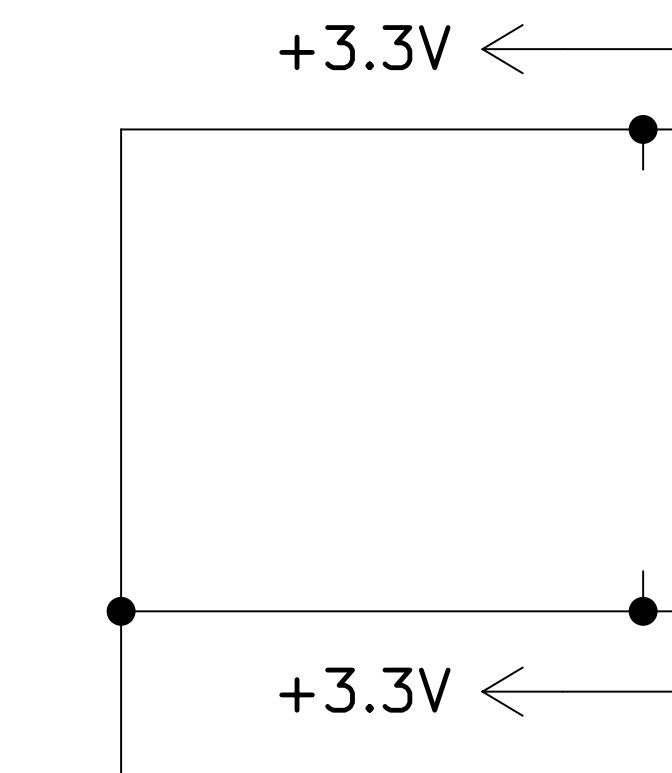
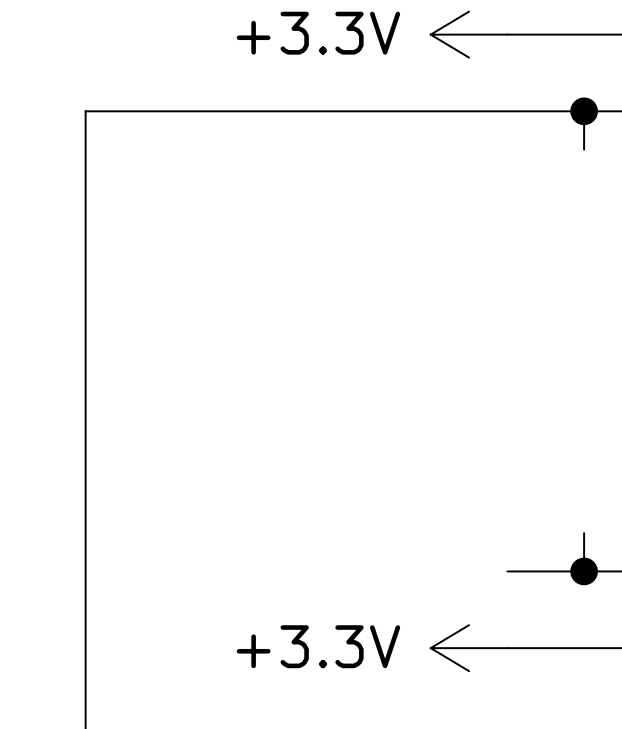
wire: (121, 611) (562, 611) -> none
junction: (121, 611) -> none

